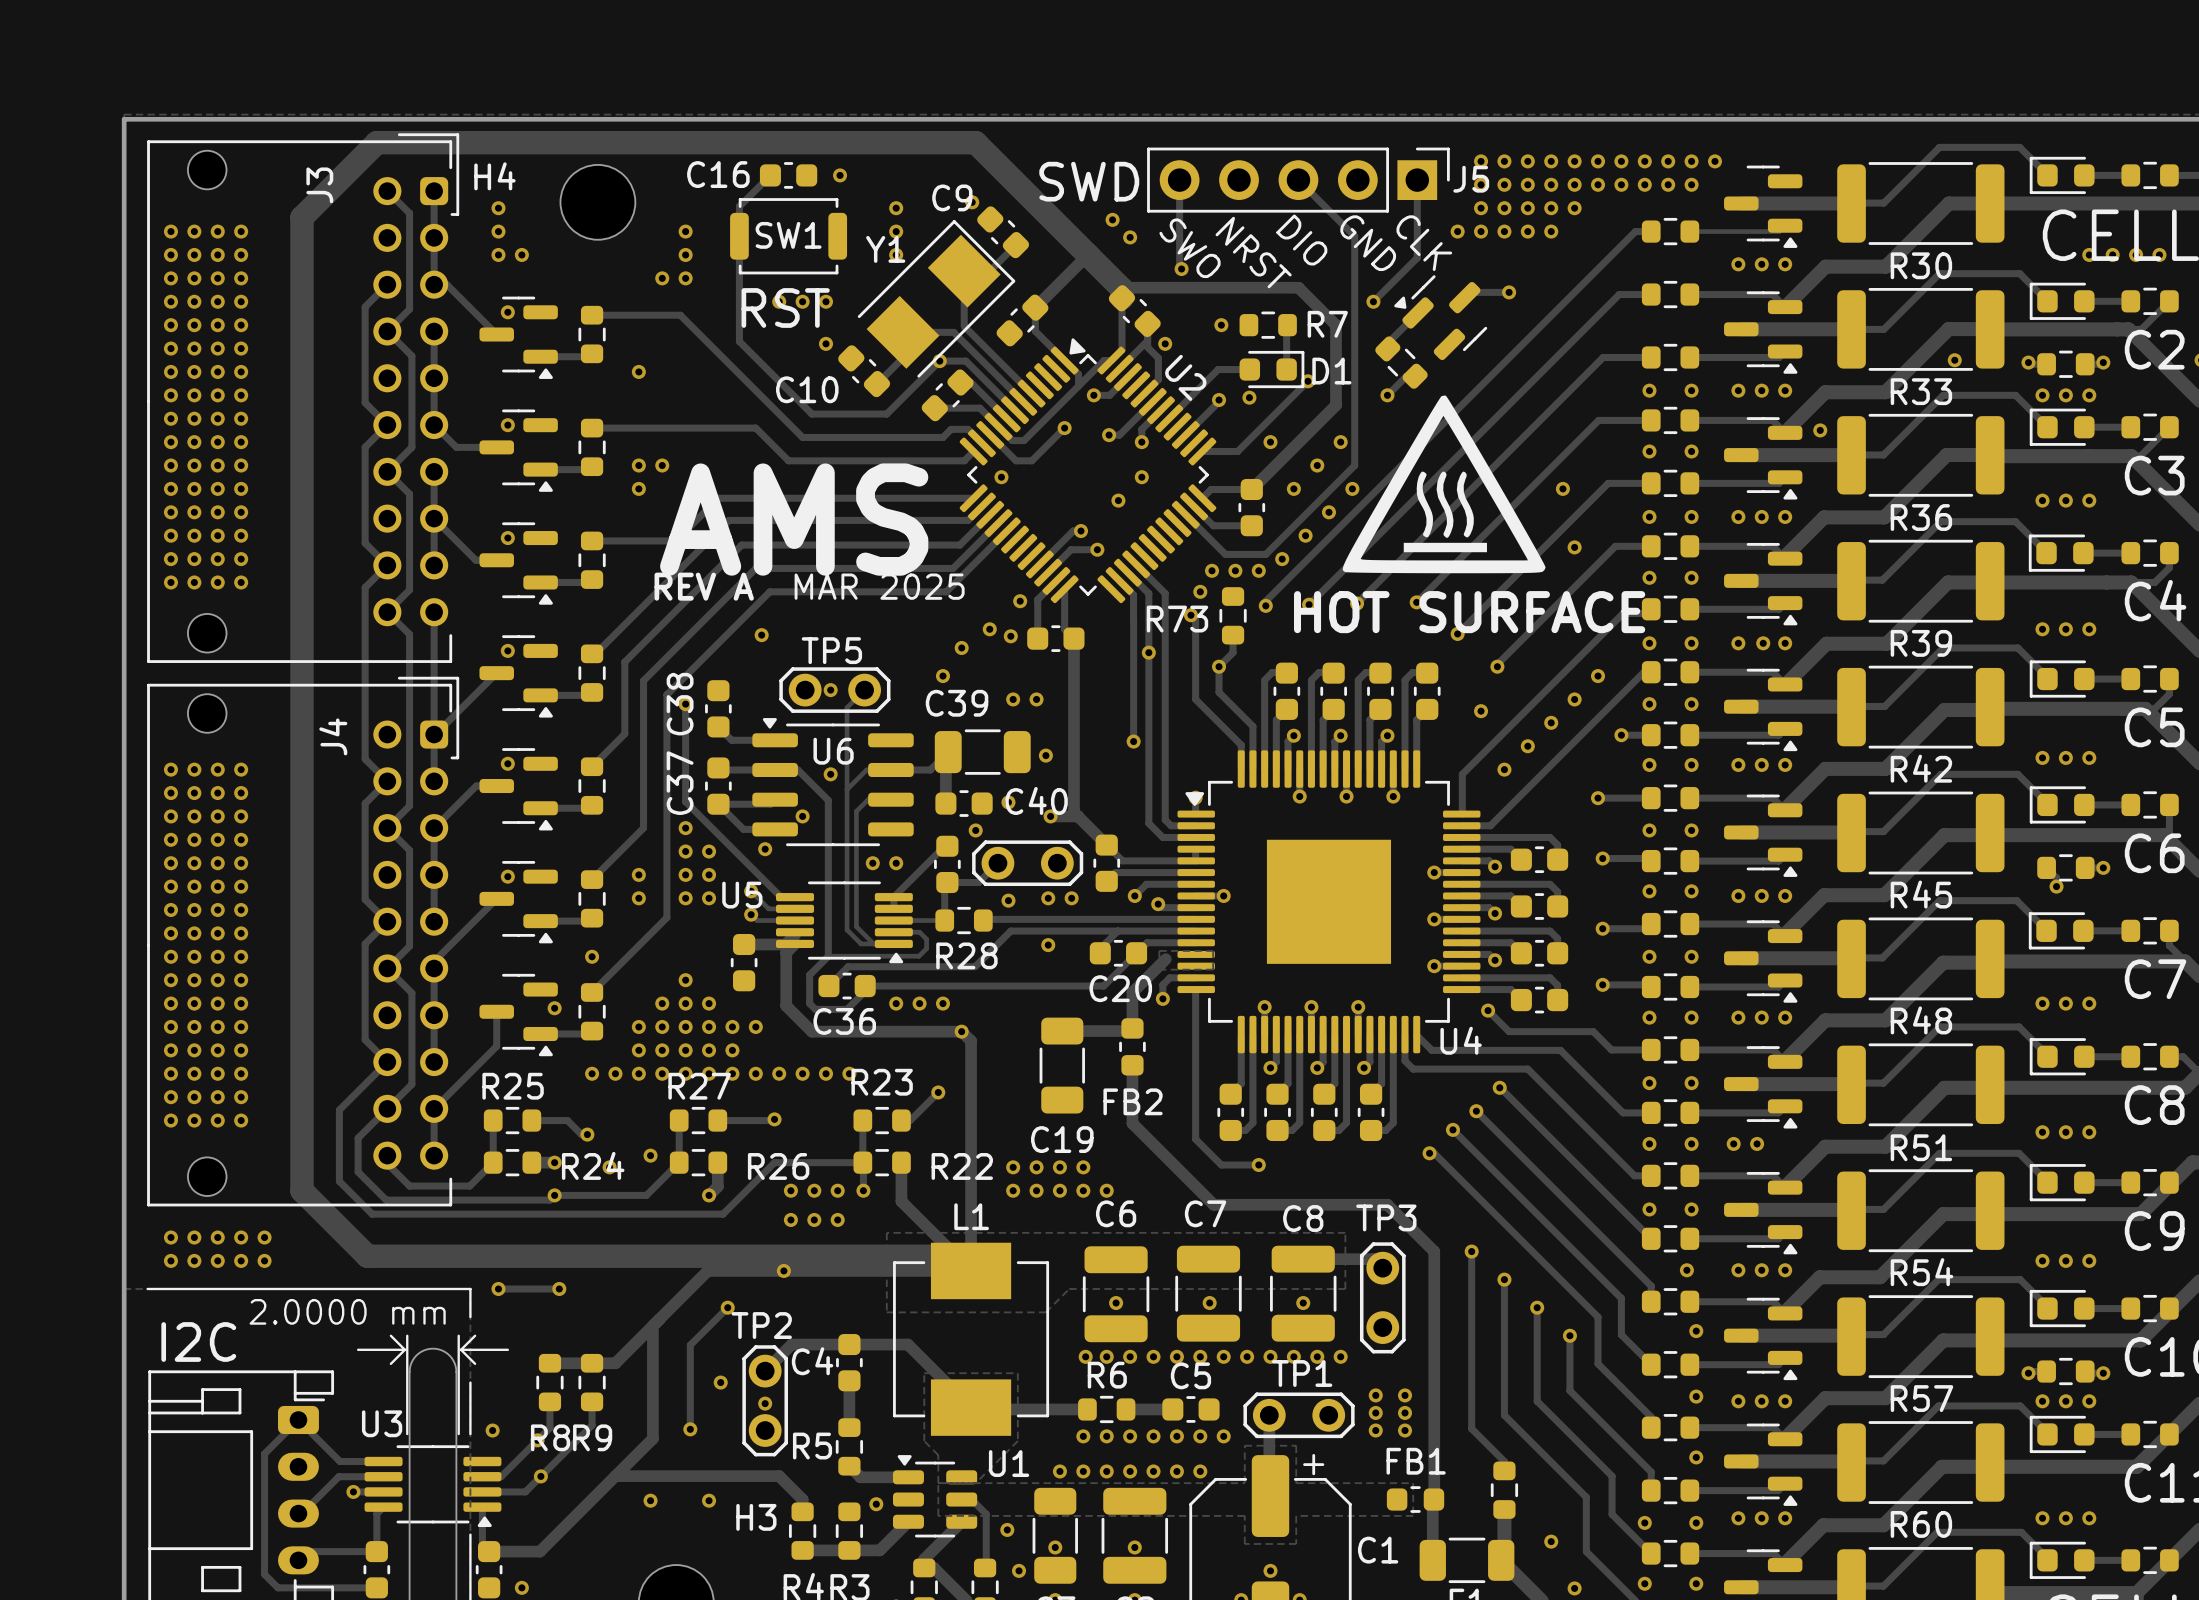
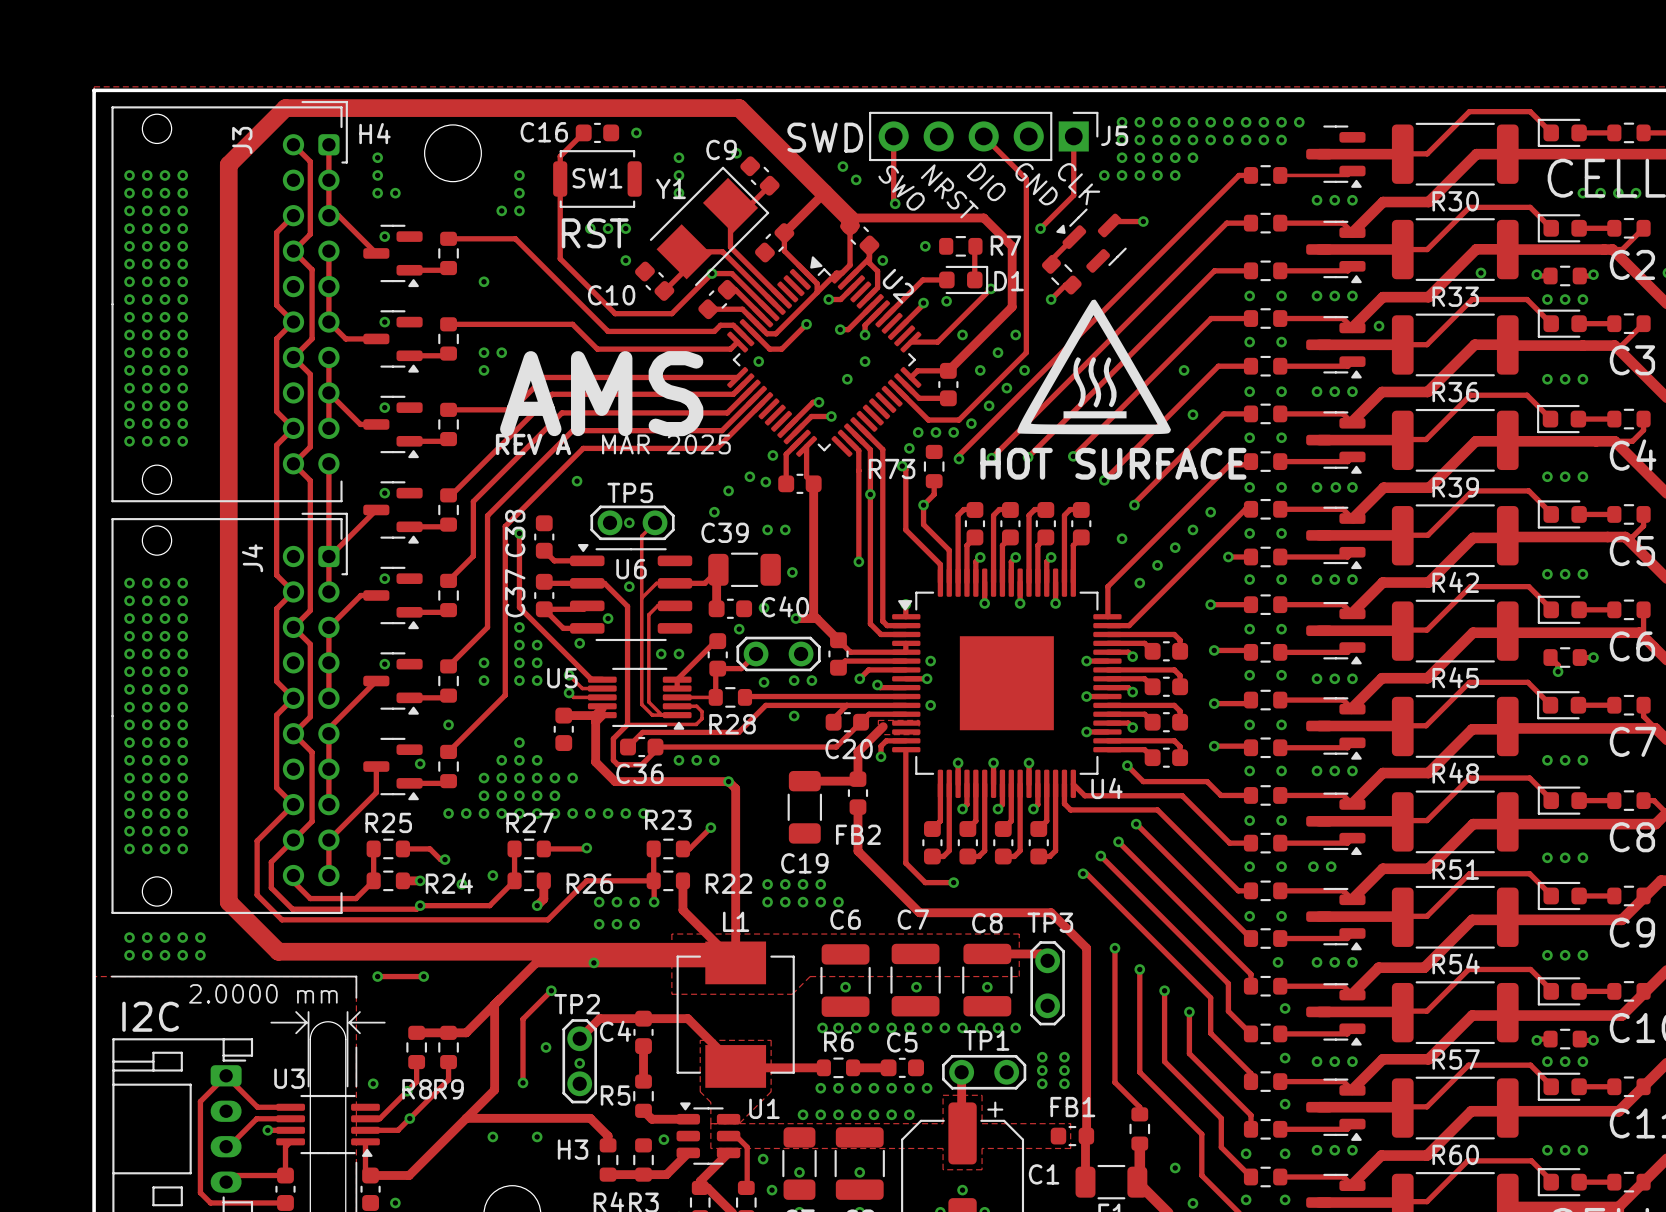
via: none -> (930, 661)
via: none -> (930, 705)

